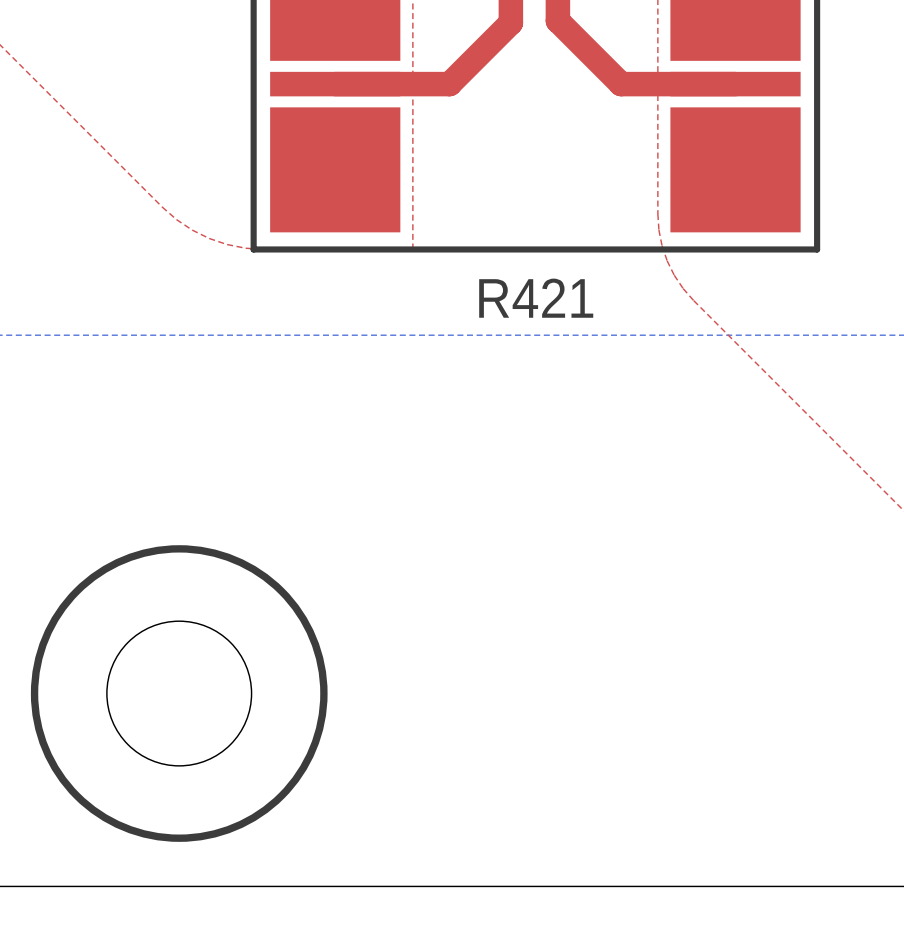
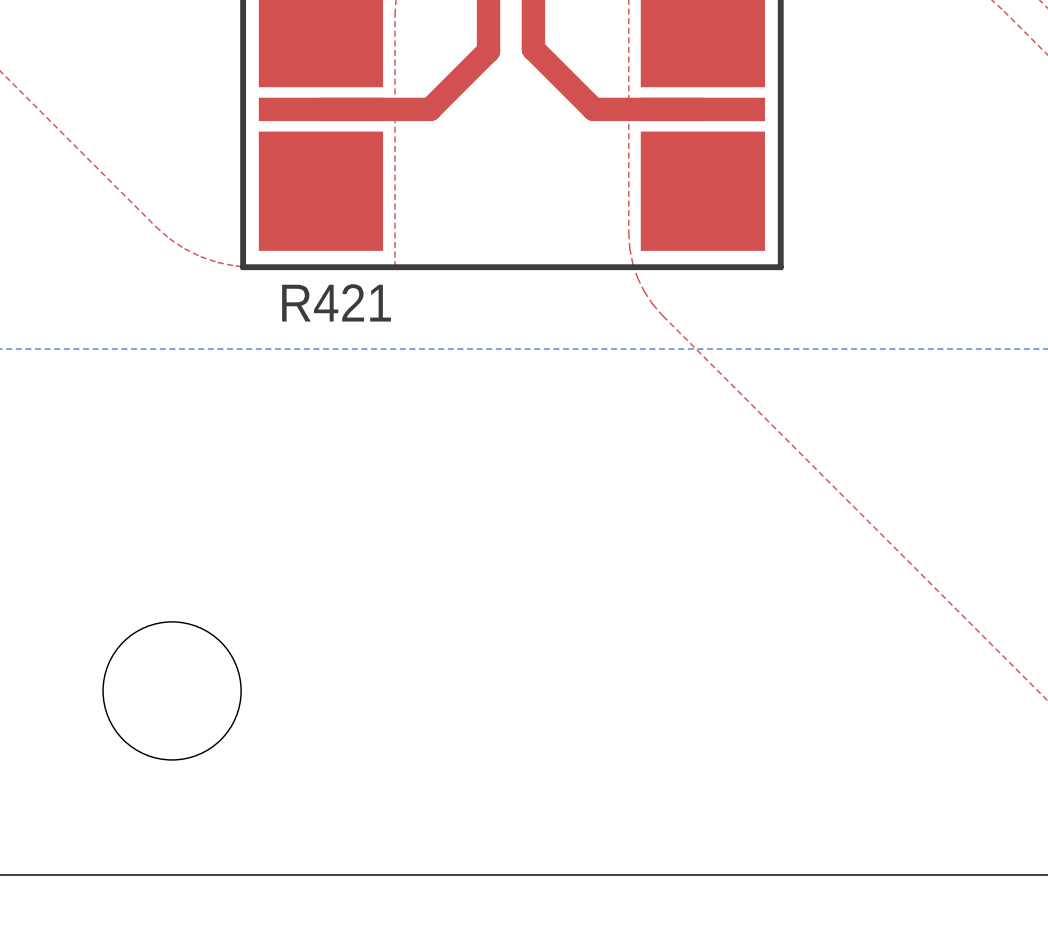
R421 name position: R421 (536, 298) -> R421 (336, 302)
drawing: [30, 545, 328, 842] -> none

